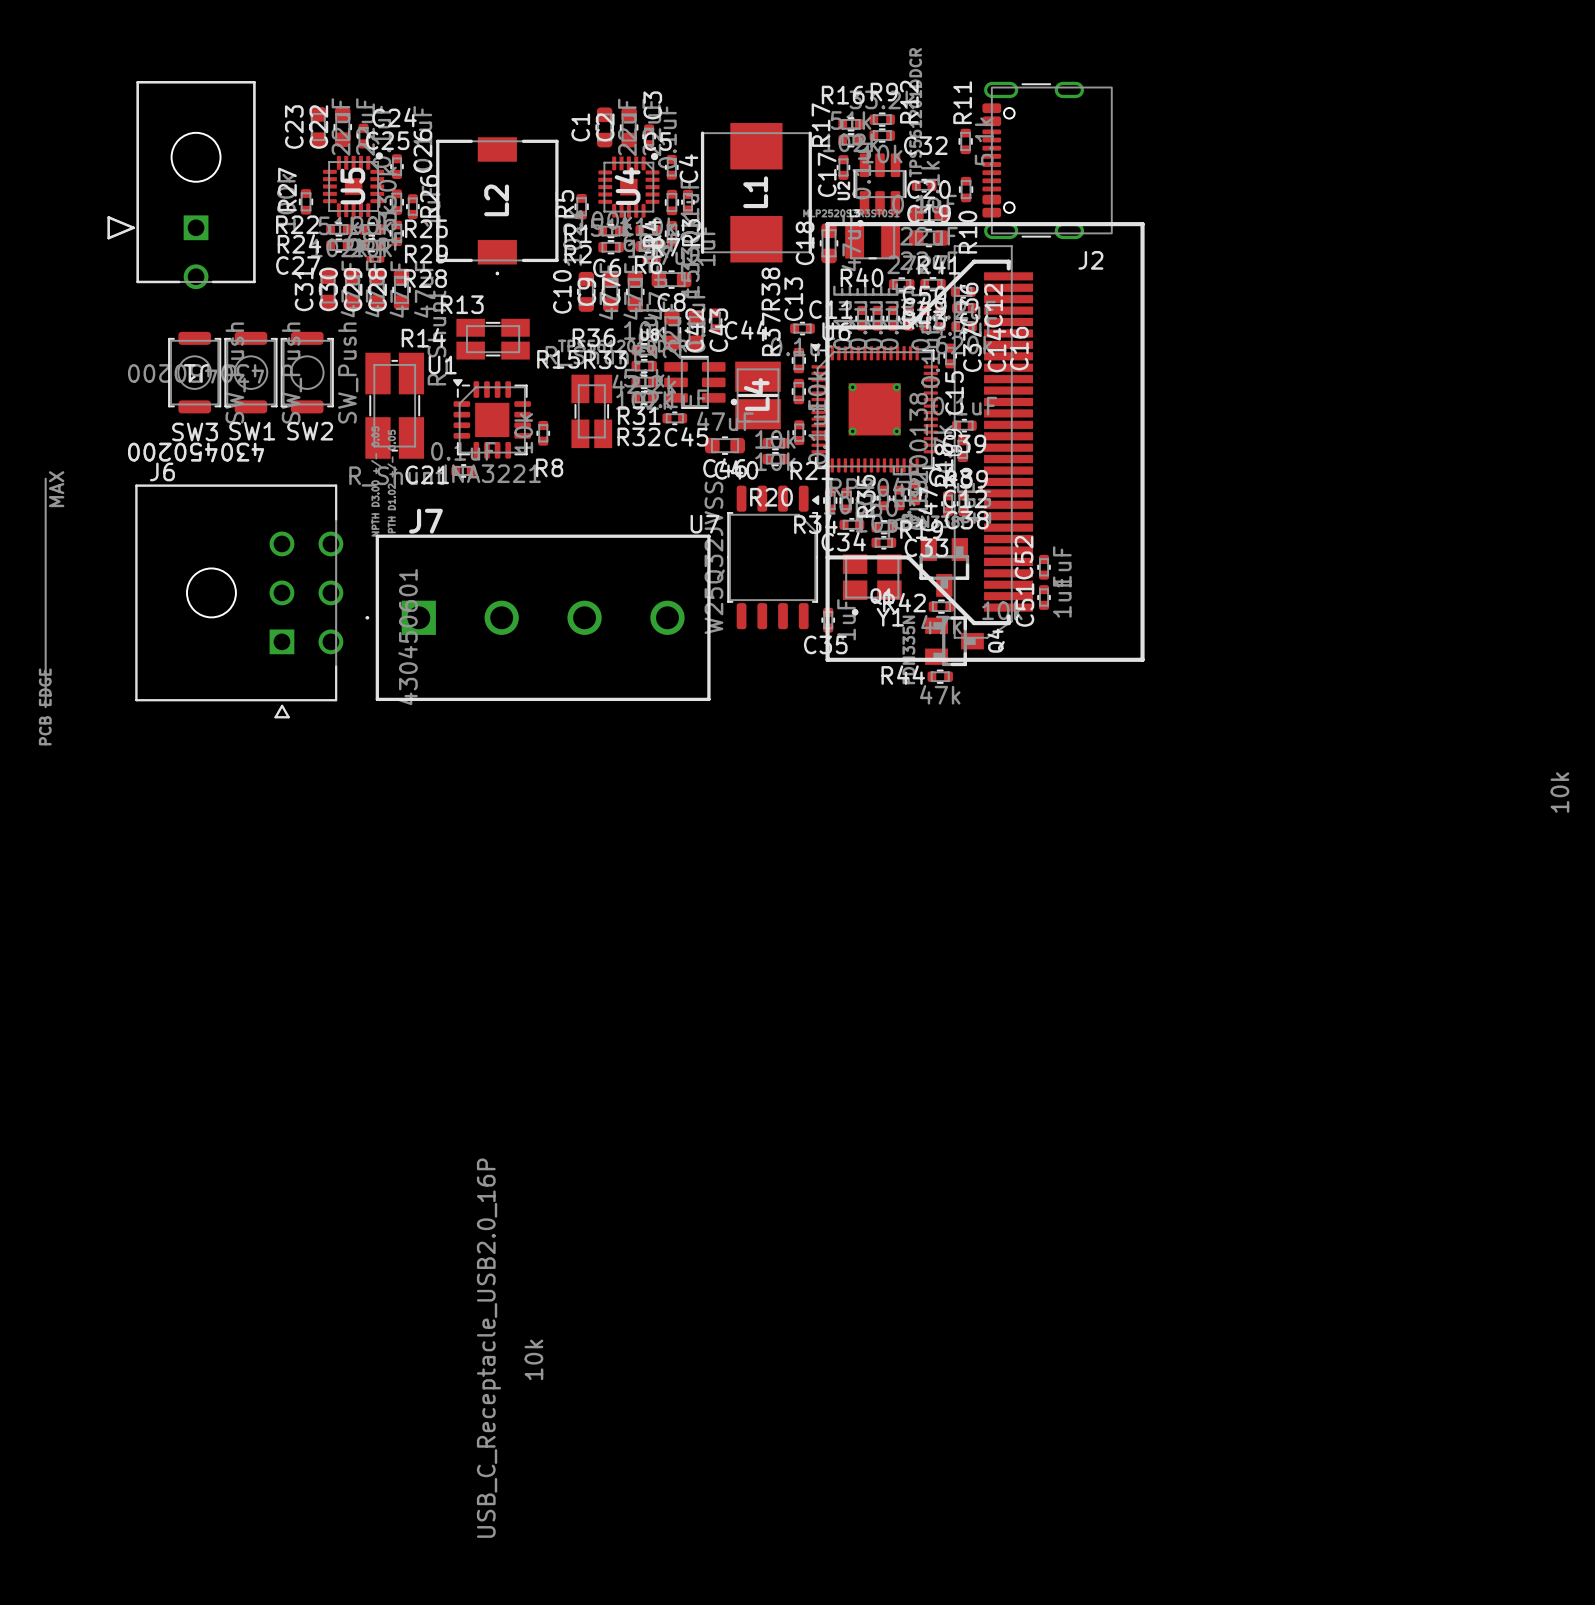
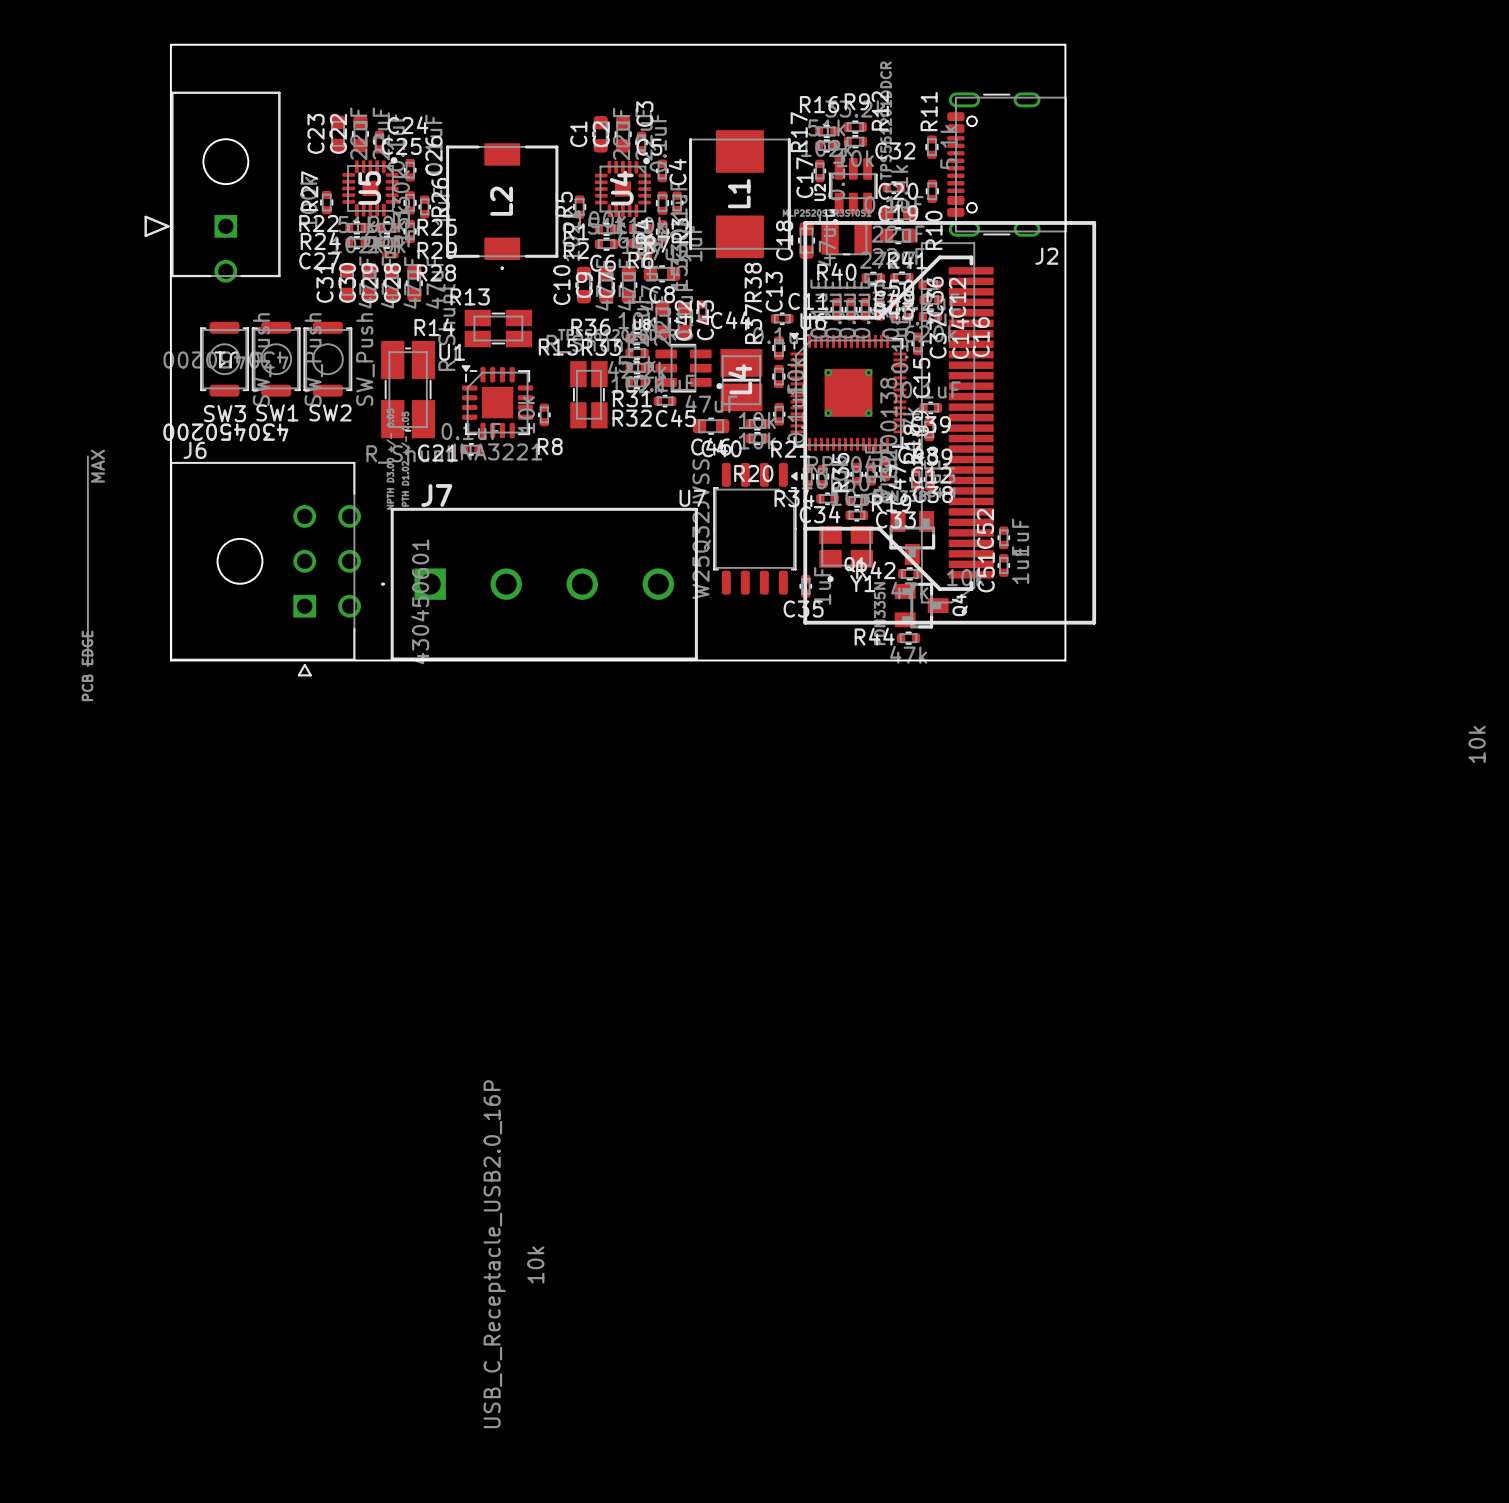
board edge: none -> (170, 44) (1065, 44) (1065, 660) (170, 660) (170, 44)

